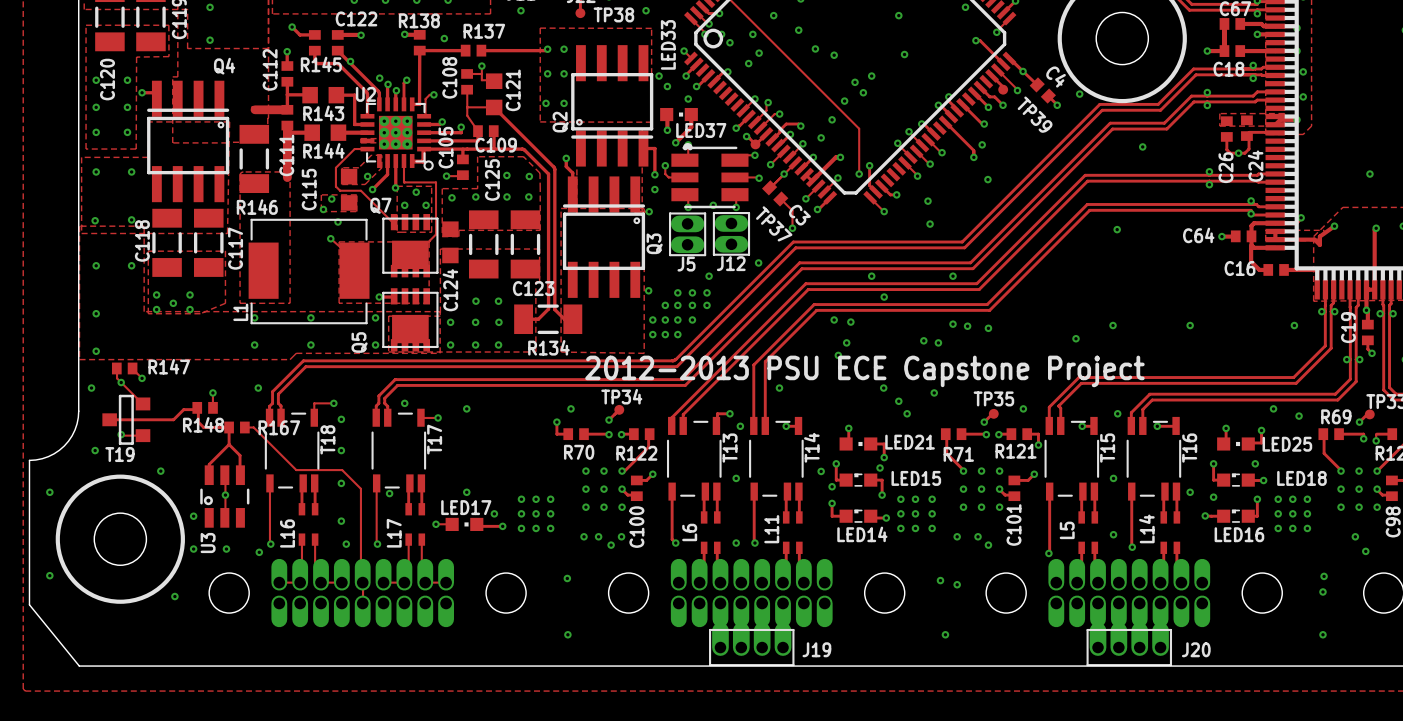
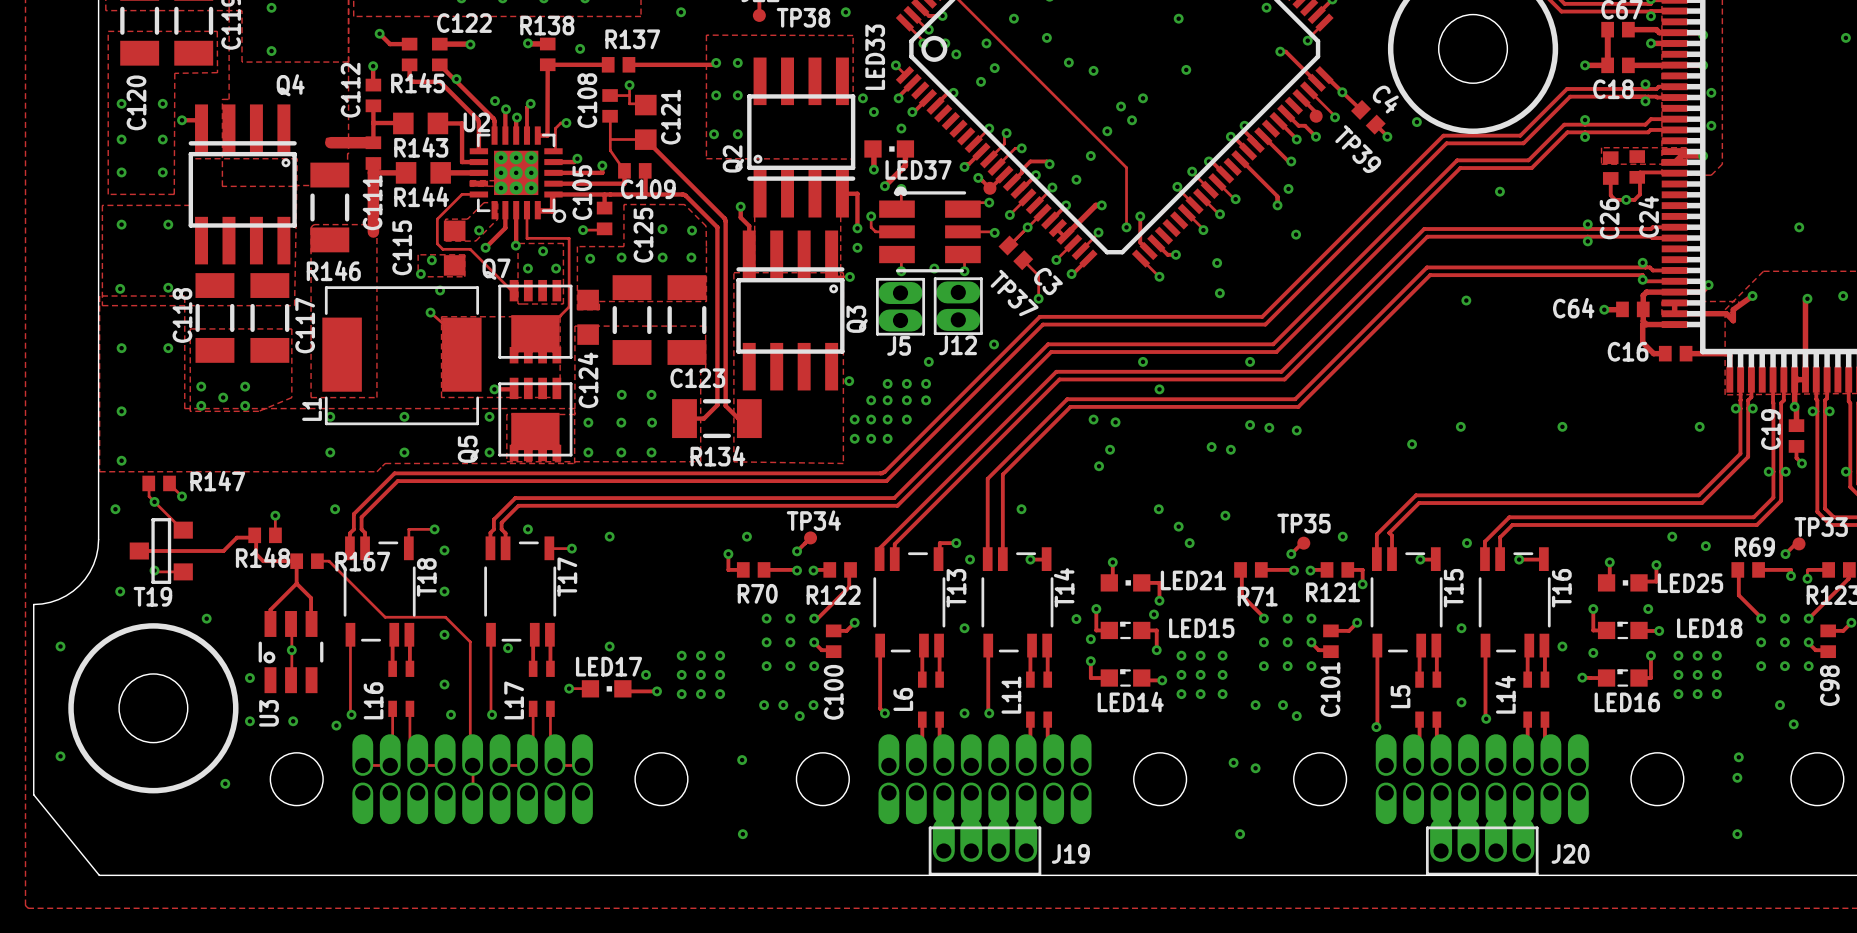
text: 2012-2013 PSU ECE Capstone Project (864, 371) -> none

